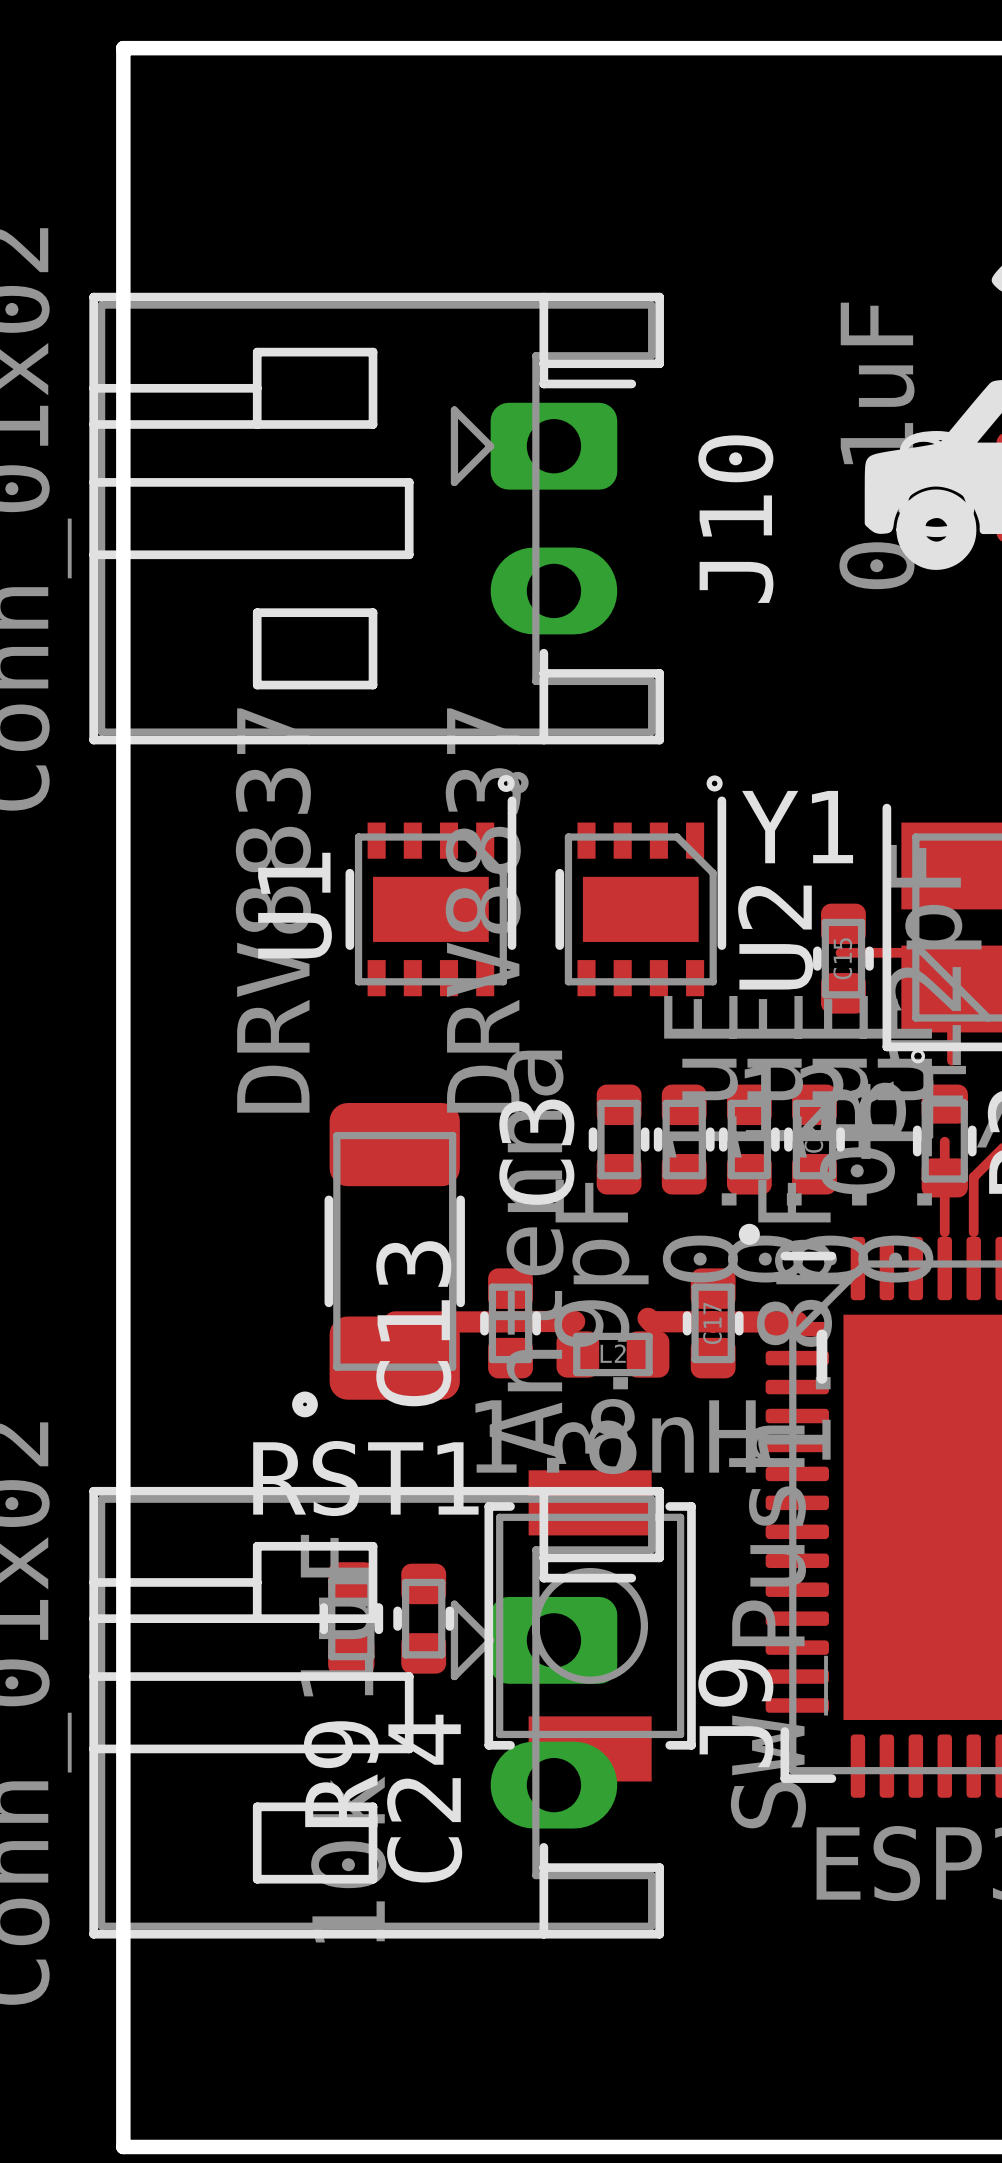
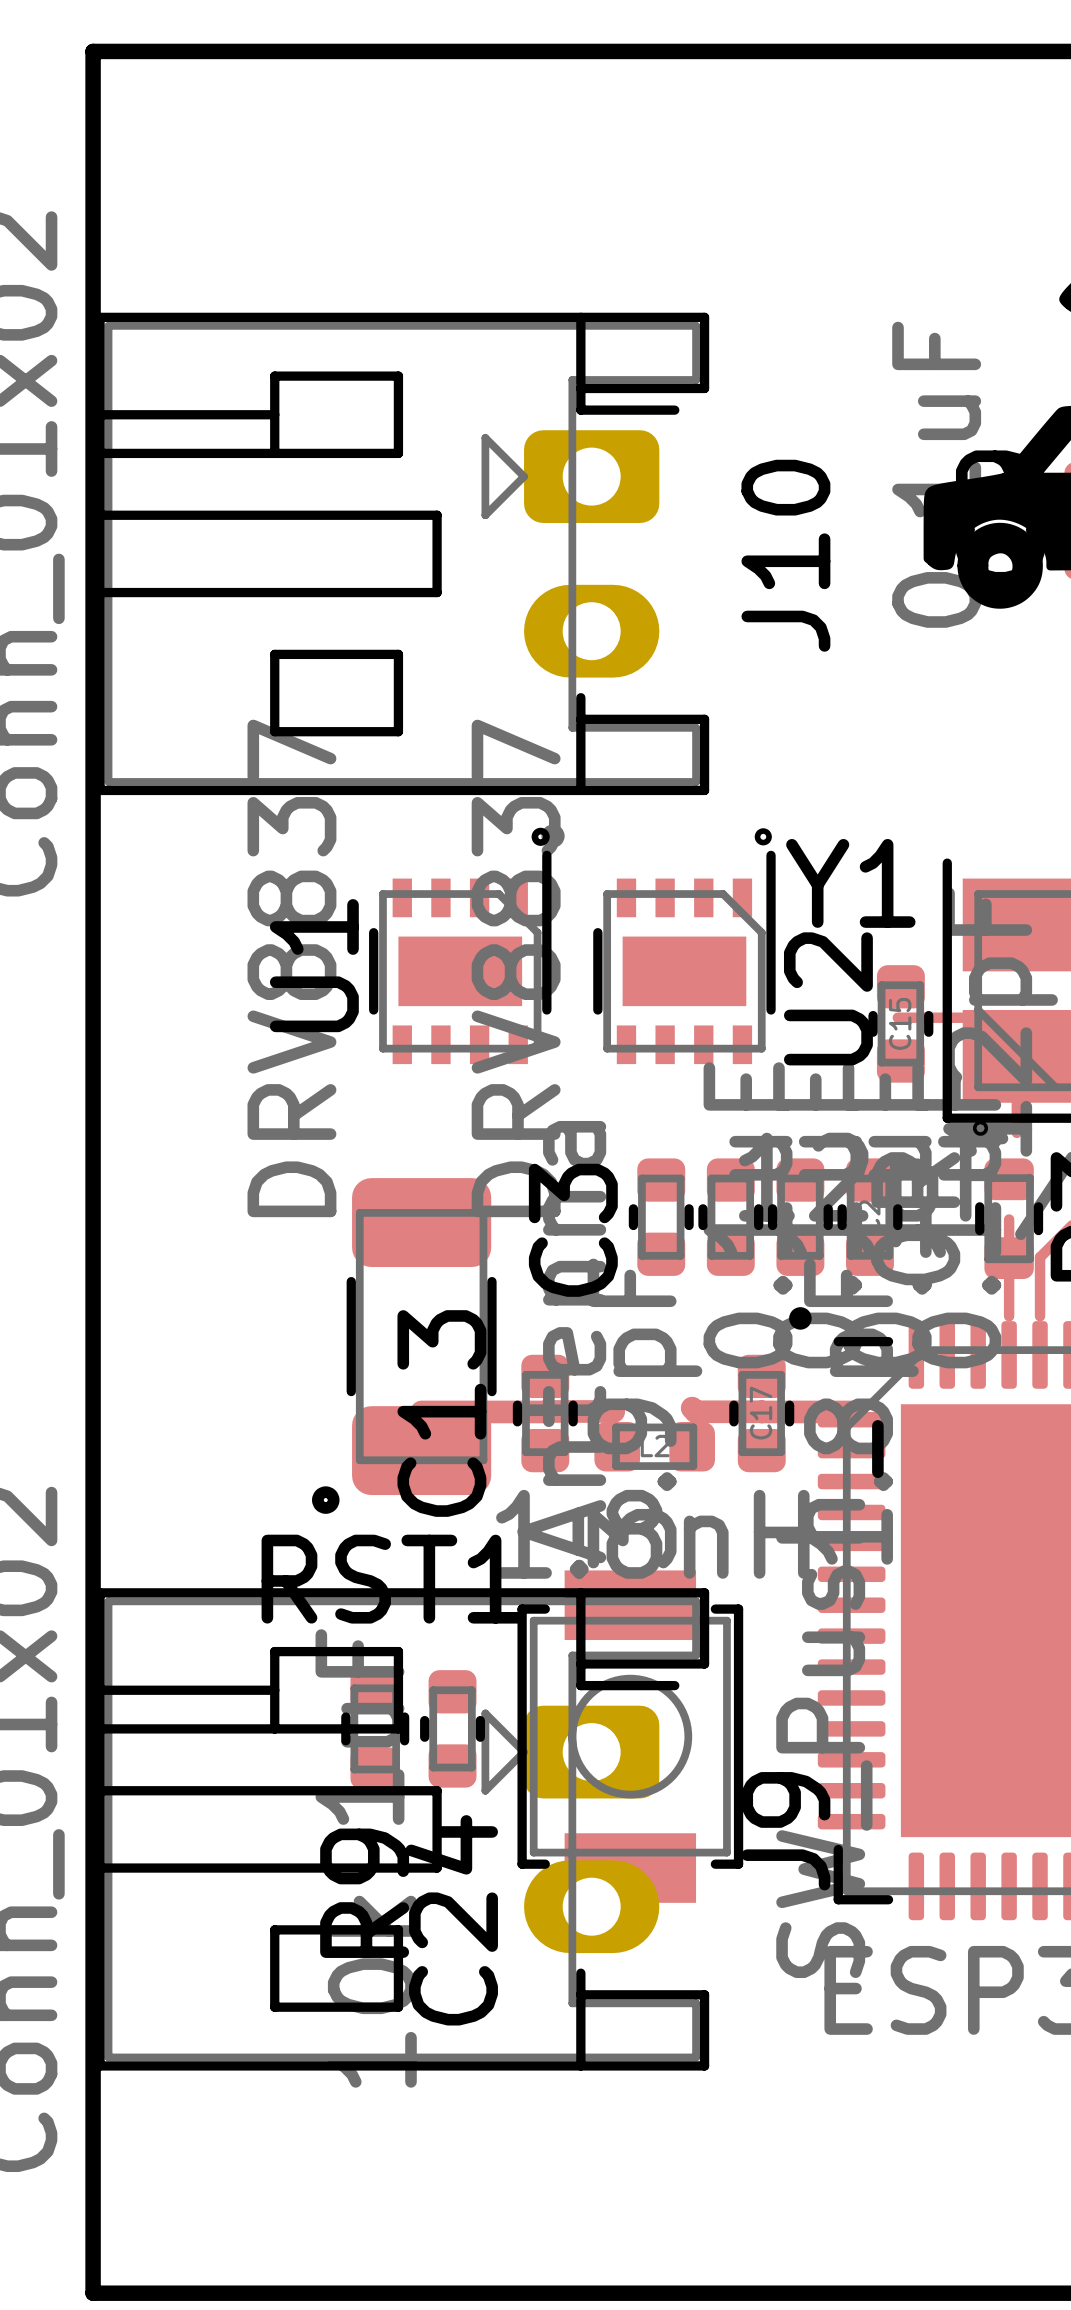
board edge: (123, 48) (123, 2146) -> (131, 51) (93, 51) (93, 2293) (131, 2293)

